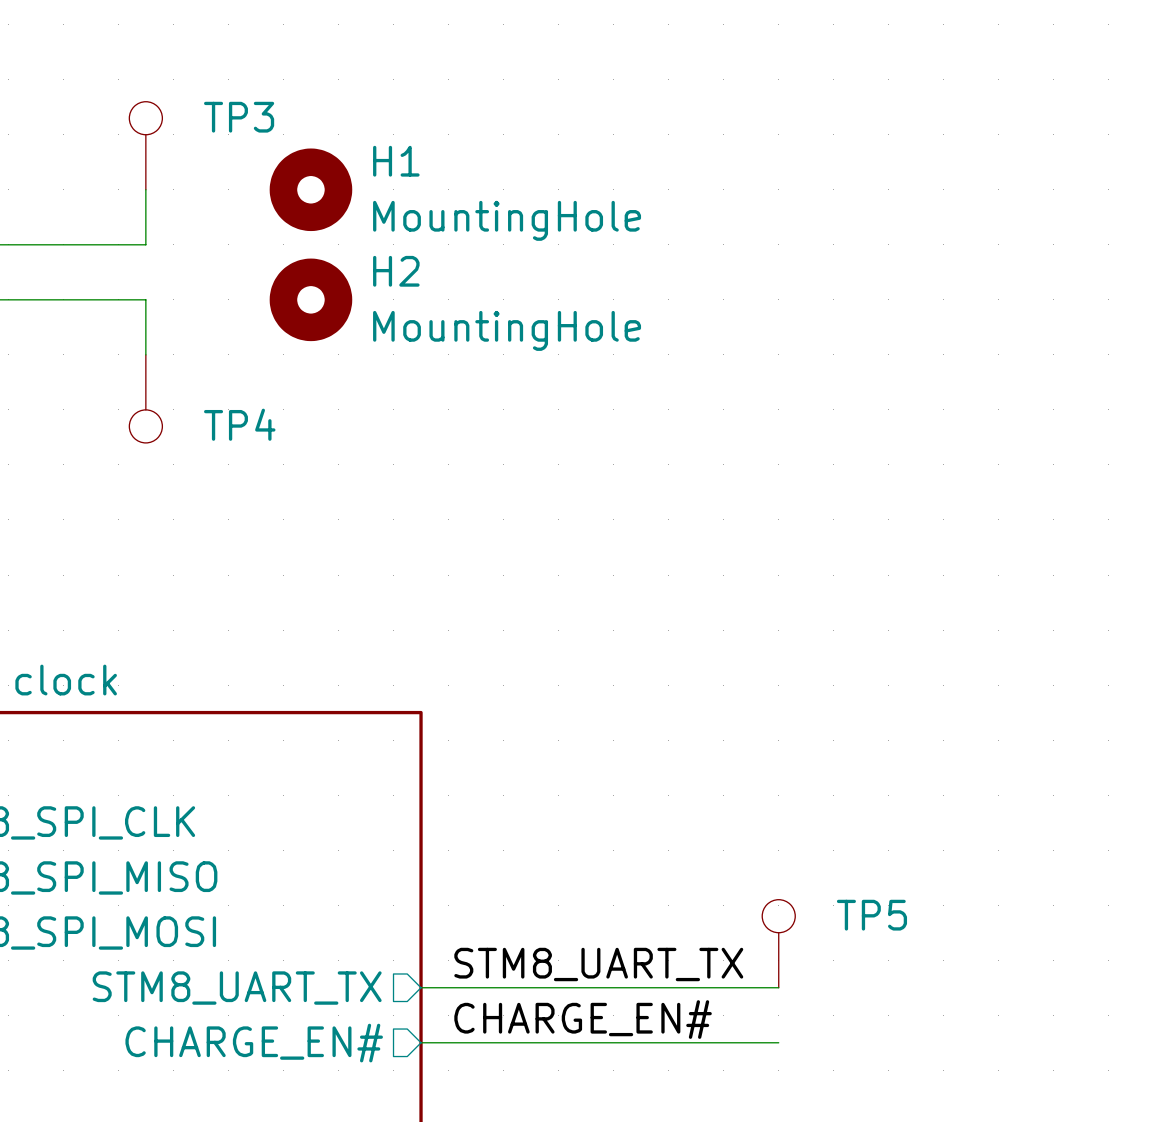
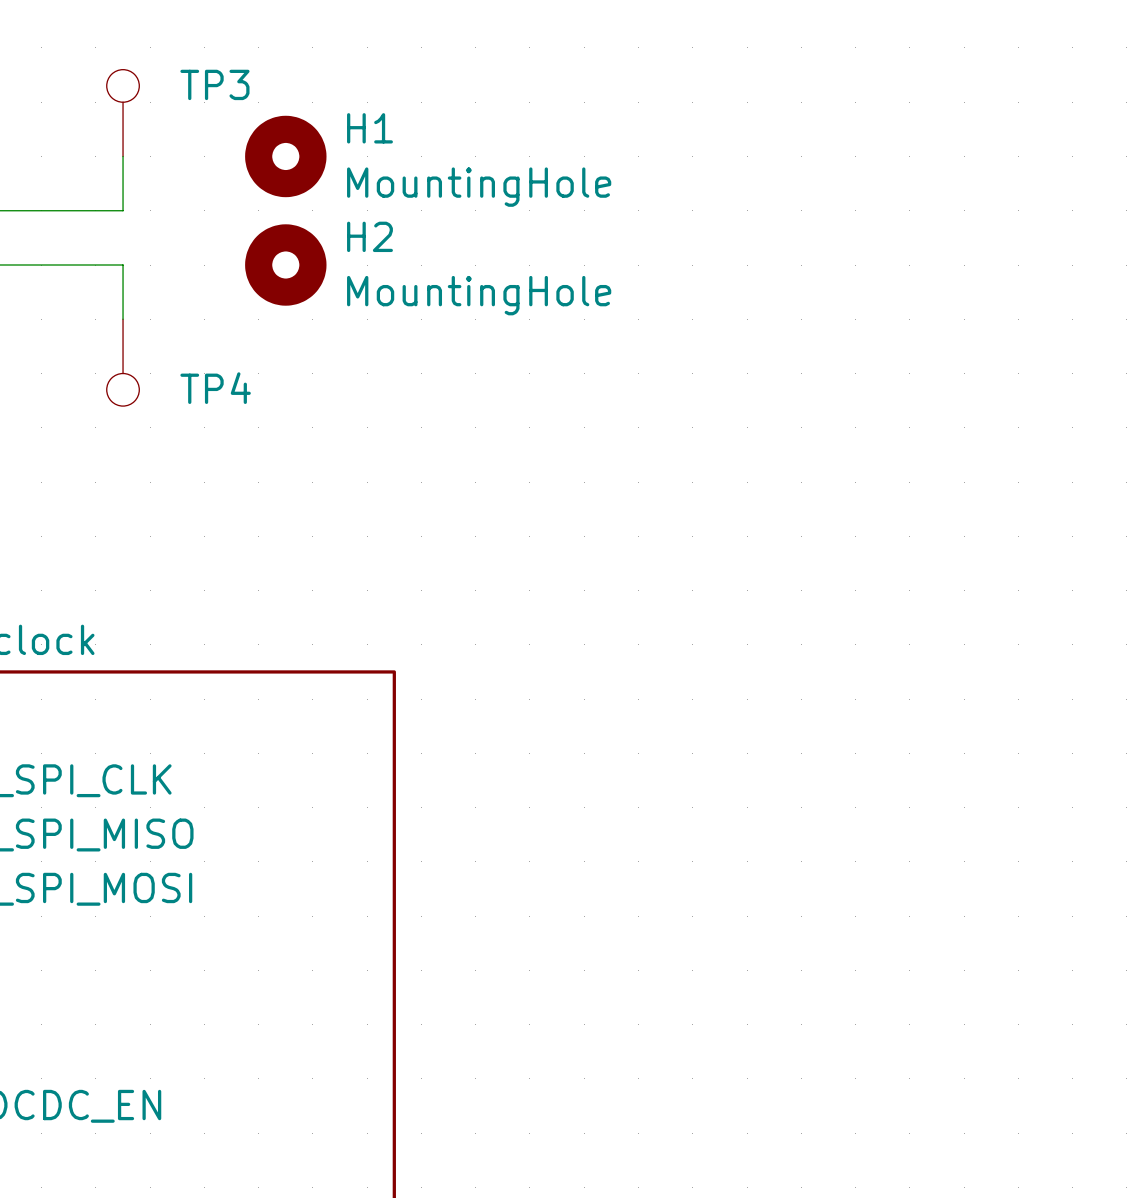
TP5: (778, 943) -> none
label: STM8_UART_TX (598, 964) -> none
wire: (421, 987) (778, 987) -> none
sheet pin: STM8_UART_TX (237, 988) -> none
label: CHARGE_EN# (583, 1019) -> none
wire: (421, 1042) (778, 1042) -> none
sheet pin: CHARGE_EN# (254, 1043) -> none

